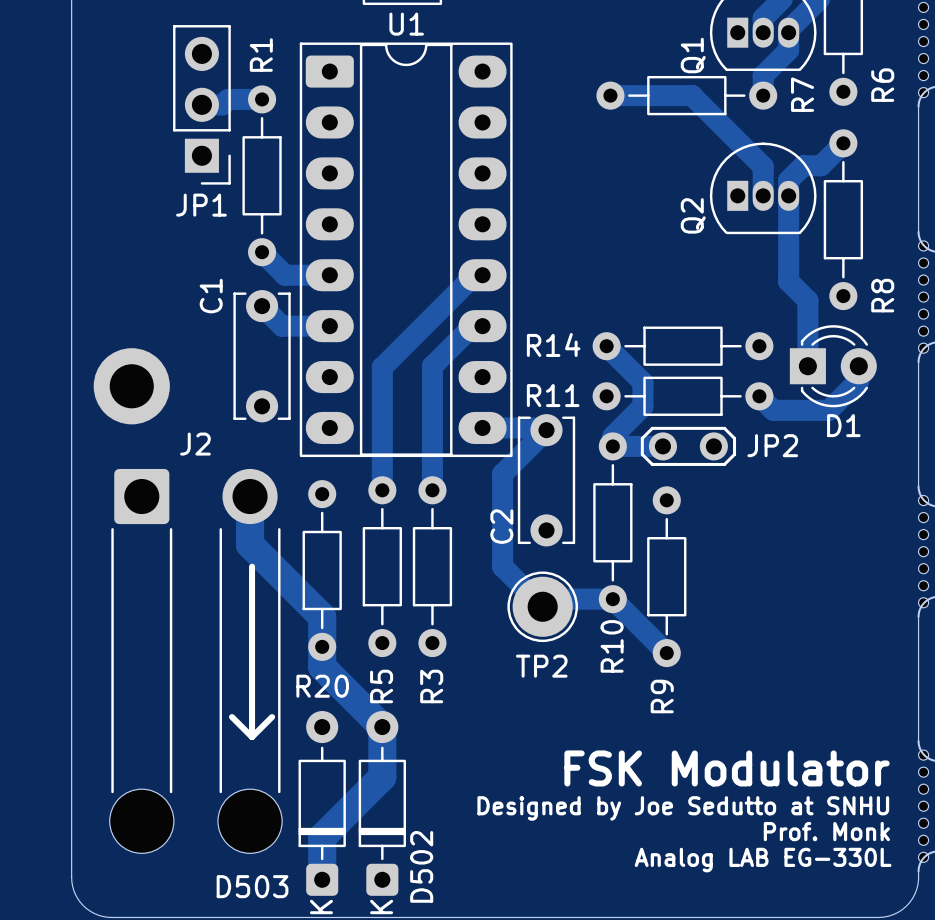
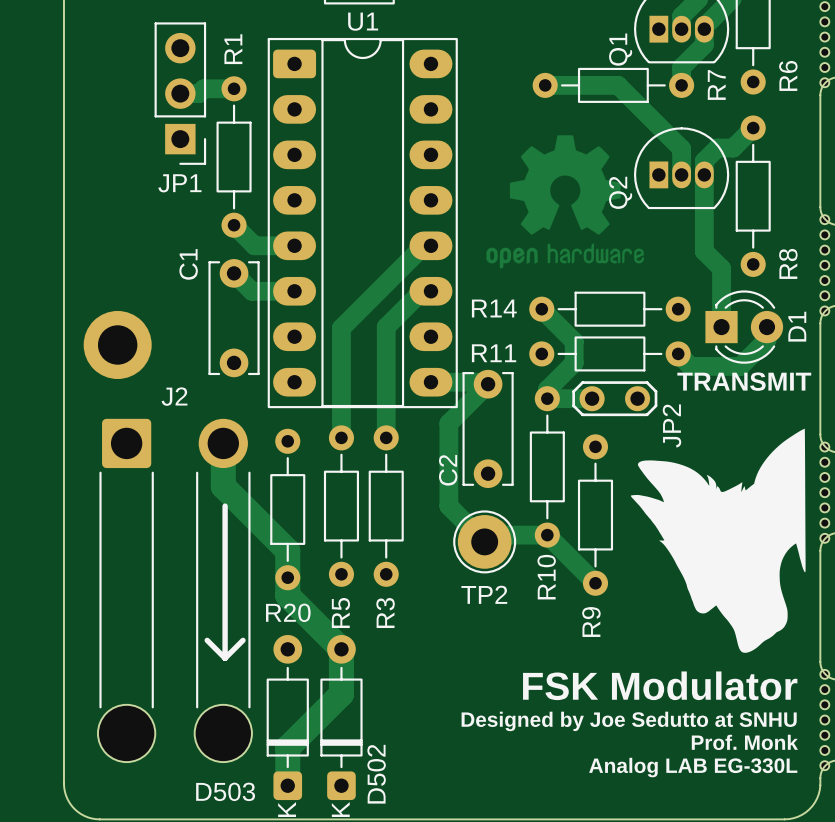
drawing: none -> [486, 135, 645, 269]
D1 name rotation: 0° (843, 425) -> 90° counterclockwise (797, 326)
D1 name position: D1 (843, 425) -> D1 (797, 326)
text: none -> TRANSMIT (744, 381)
JP2 name rotation: 0° (772, 445) -> 90° counterclockwise (671, 425)
drawing: none -> [630, 428, 806, 653]

